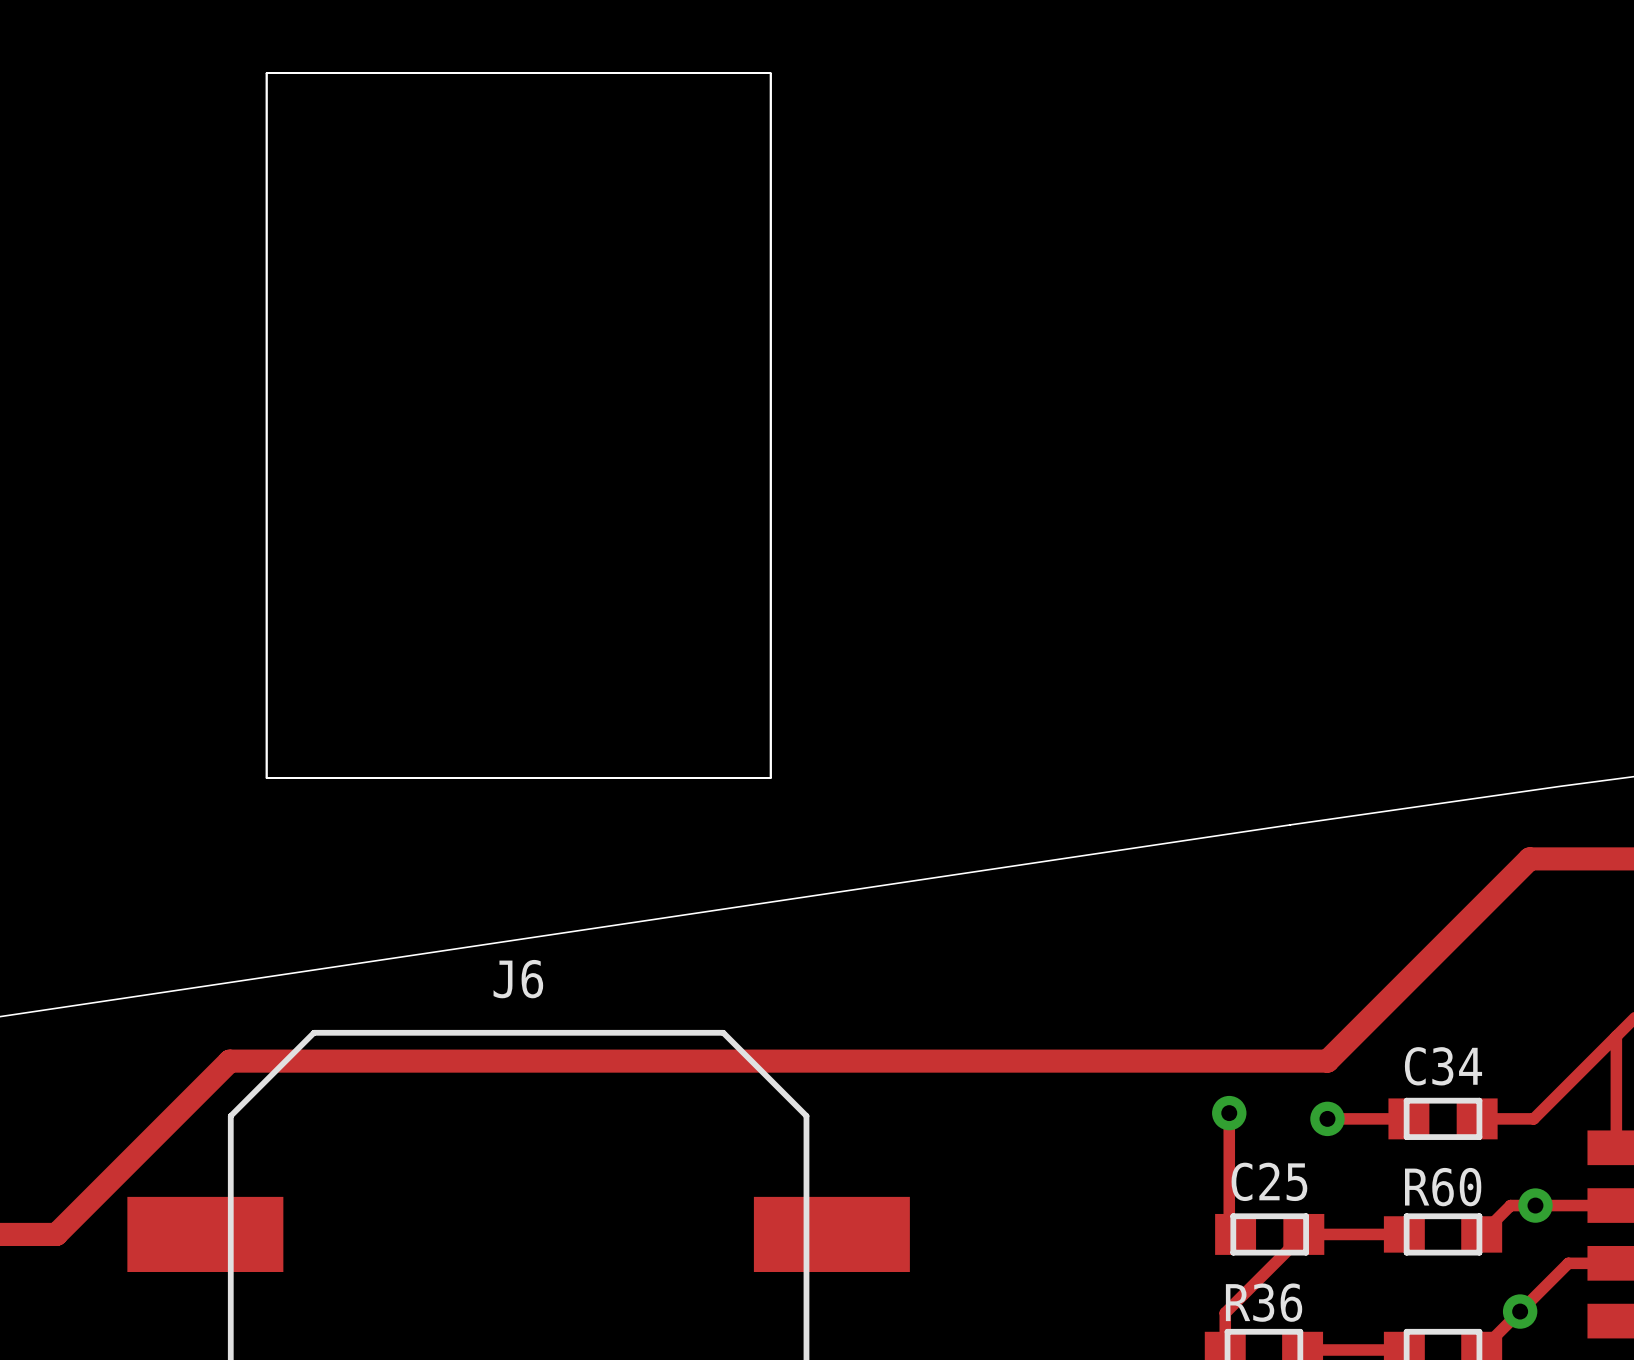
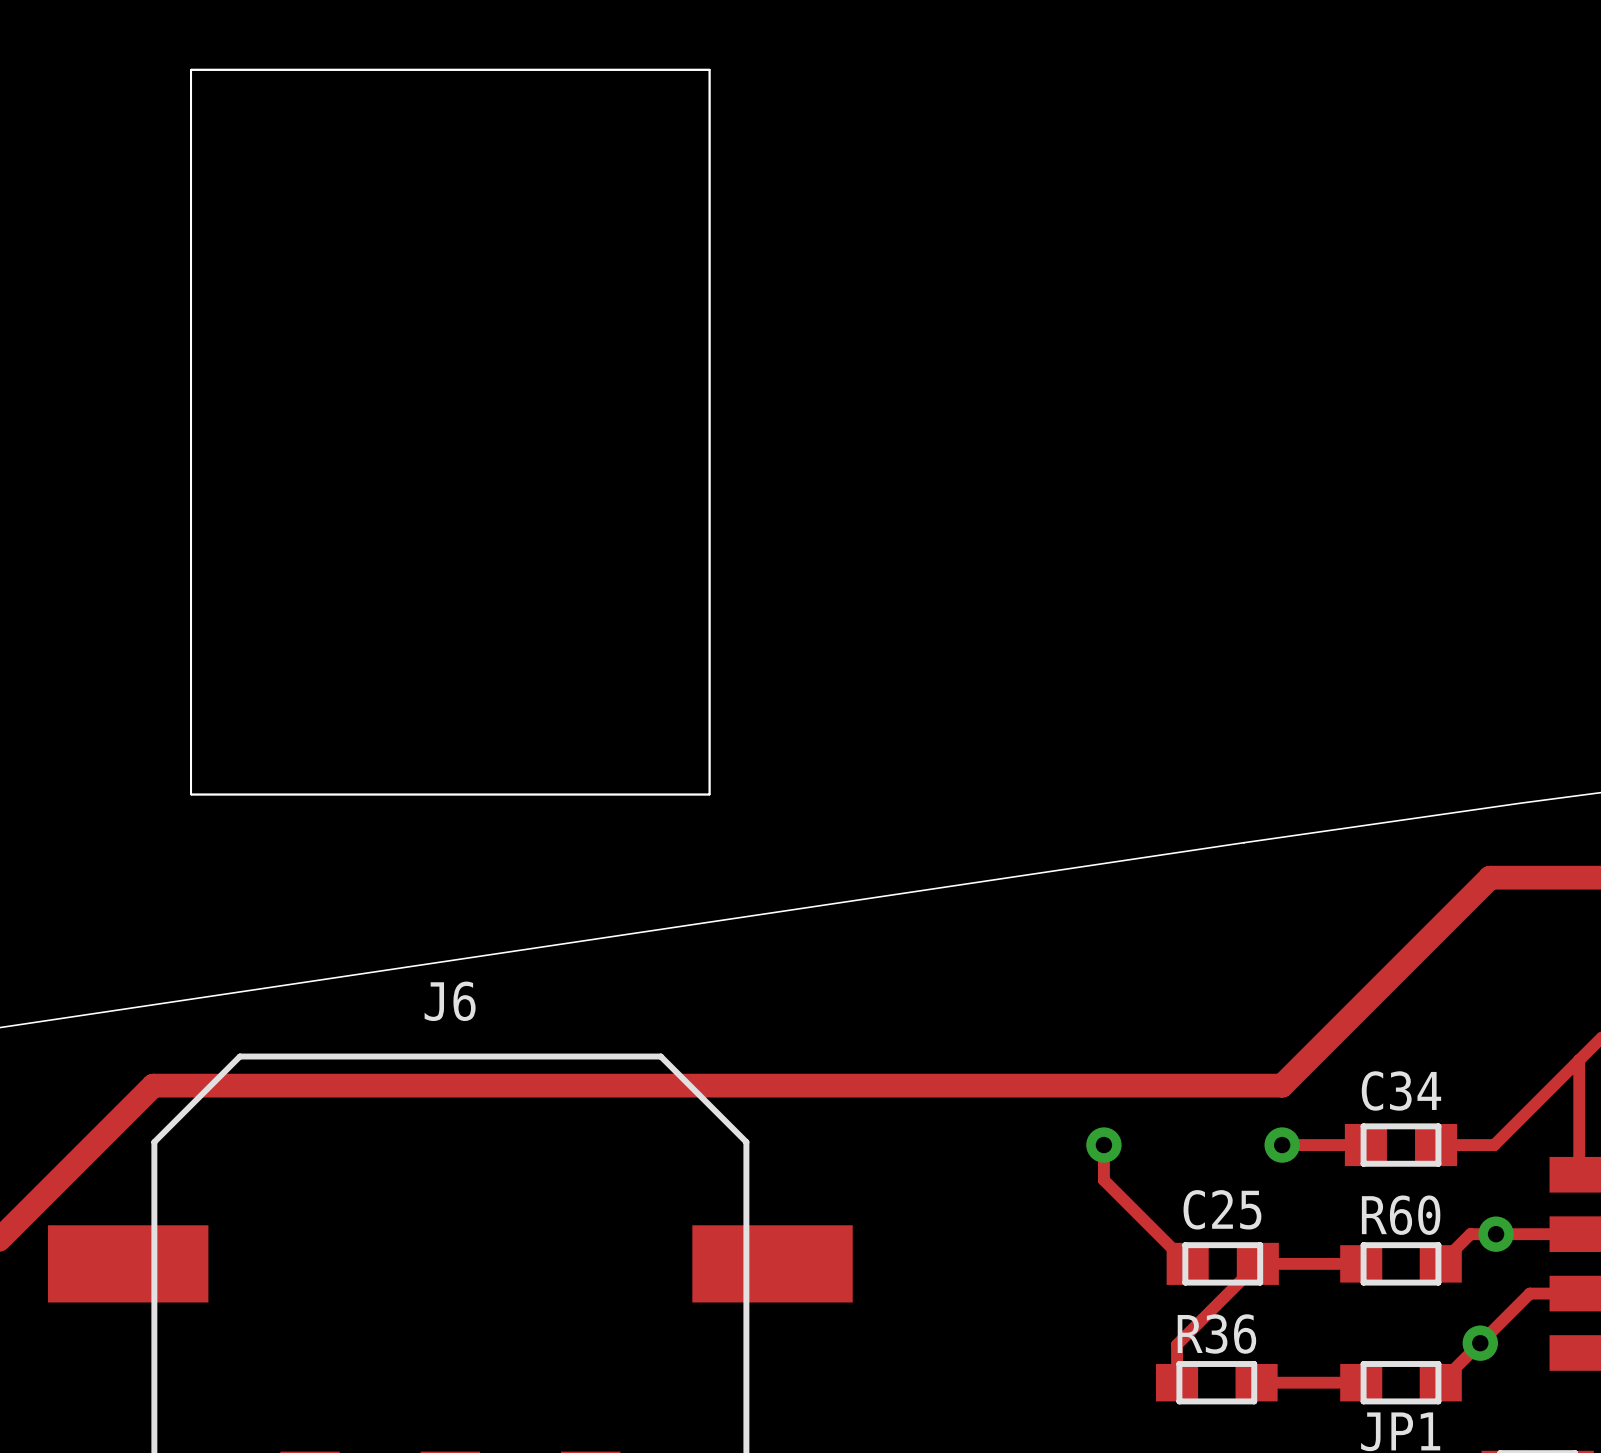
track: (1229, 1113) (1229, 1228) -> (1103, 1145) (1103, 1180) (1181, 1257)
via position: (1229, 1113) -> (1103, 1145)

